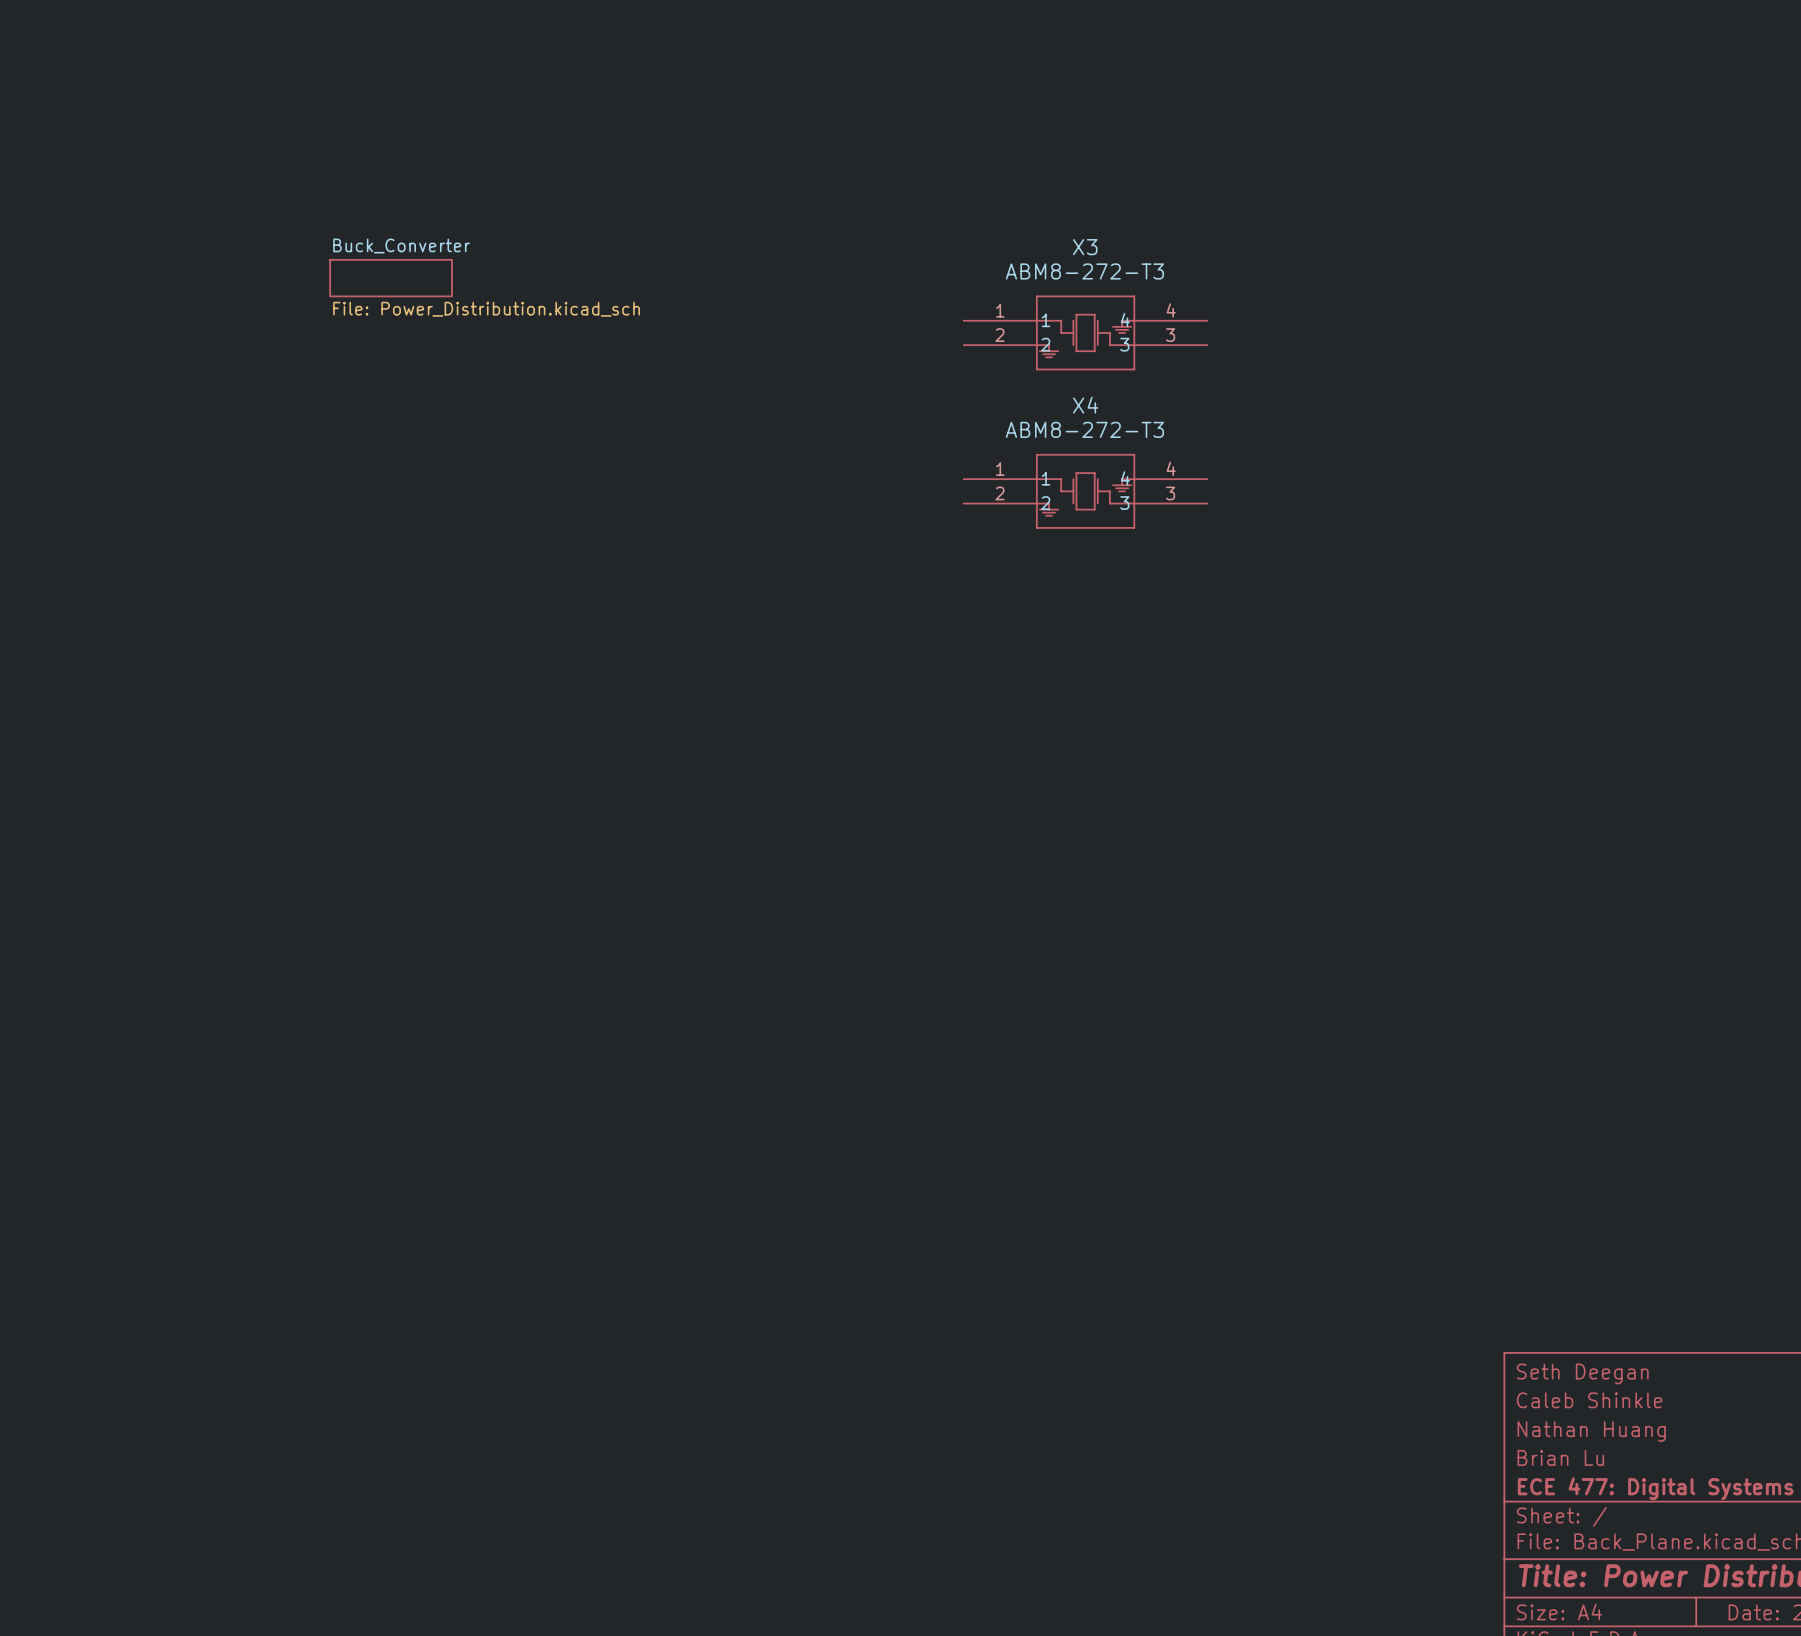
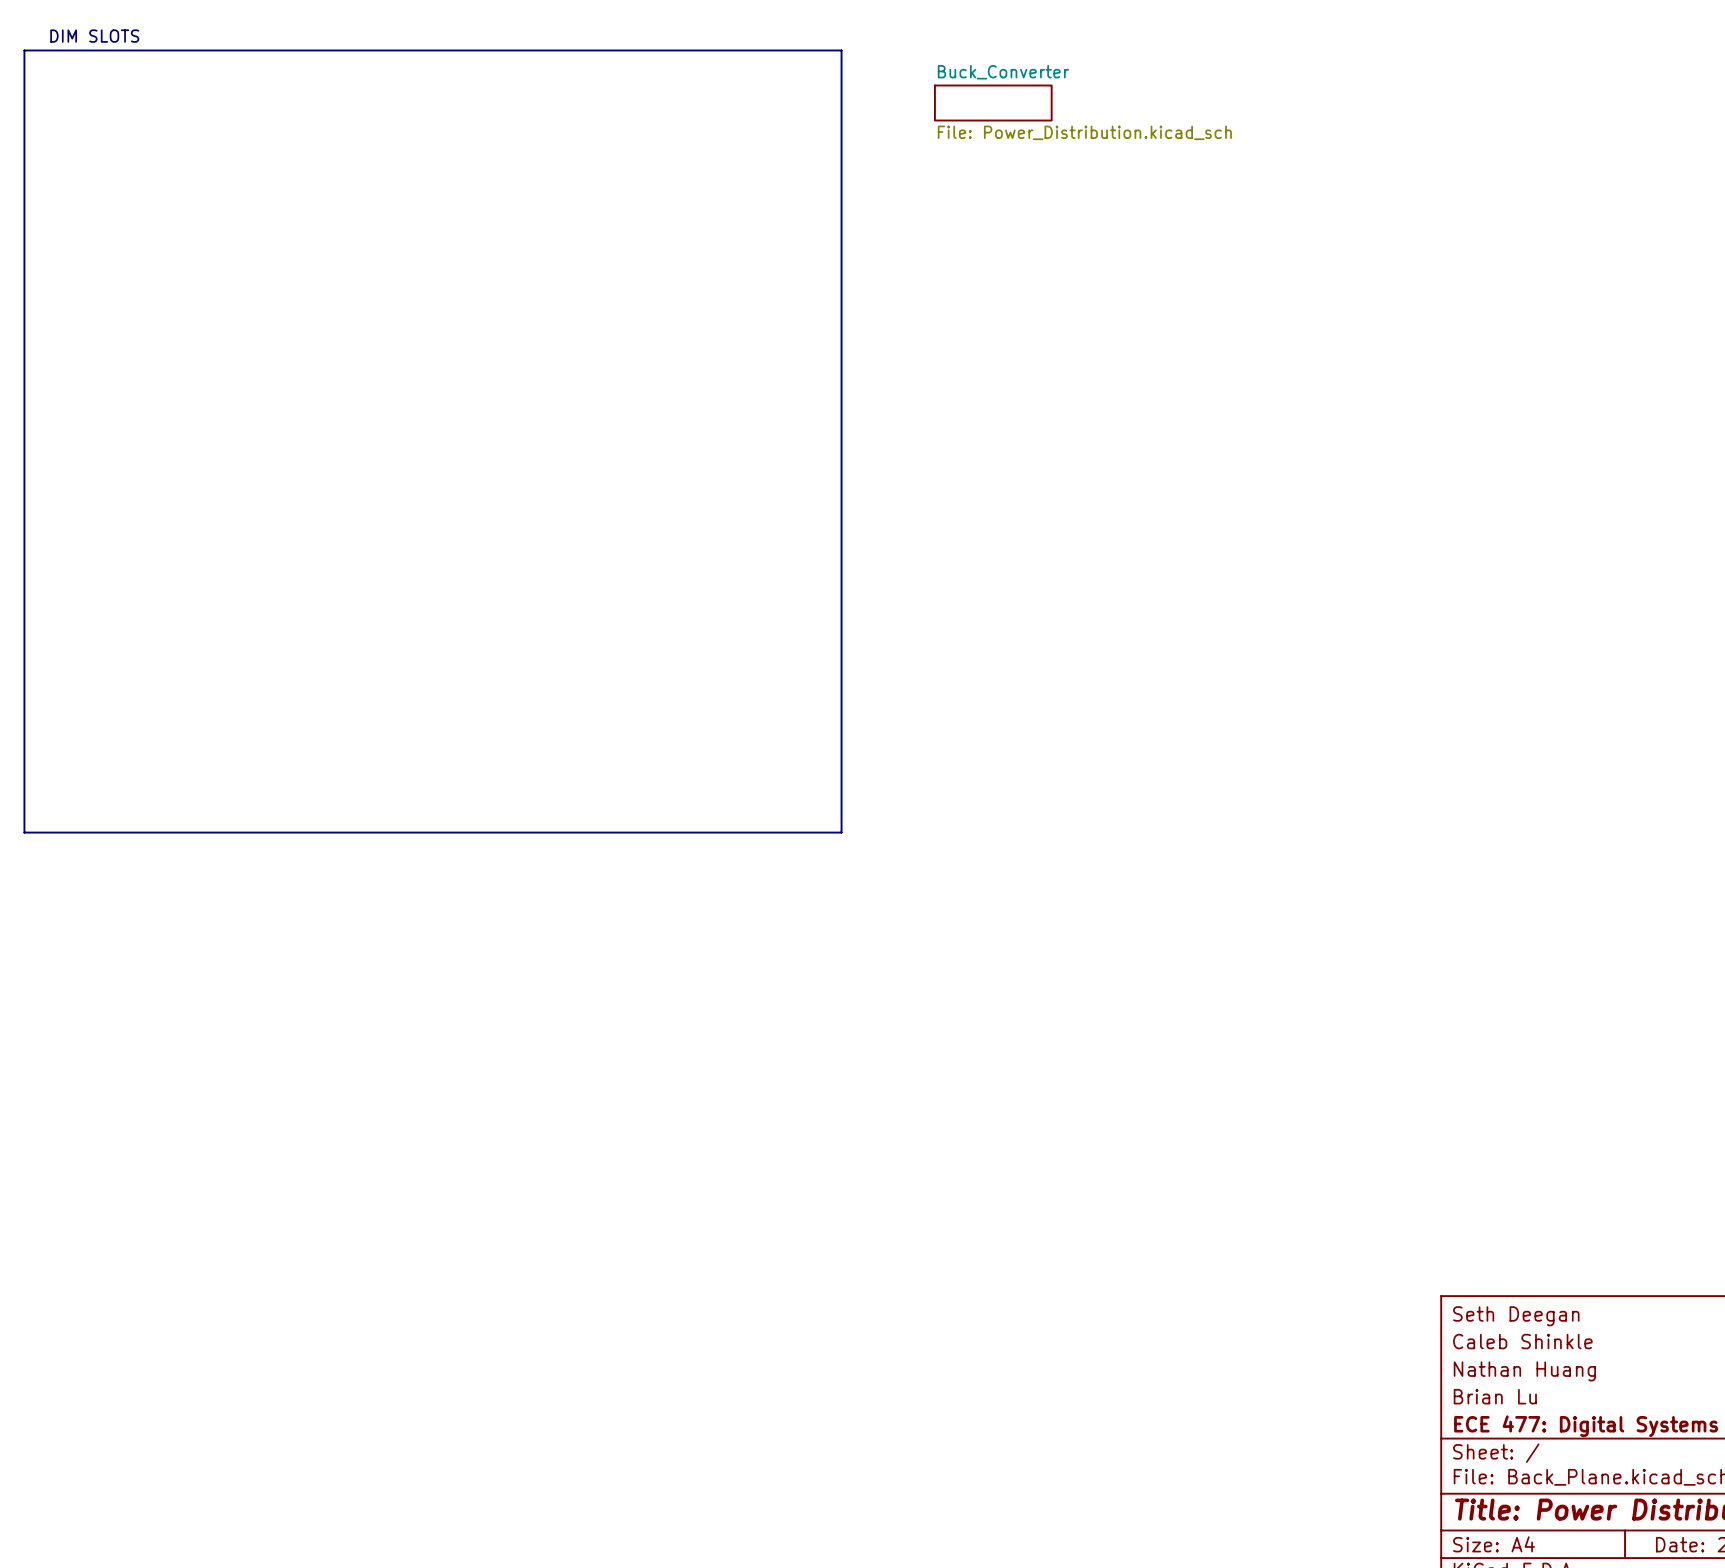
text: none -> DIM SLOTS (94, 36)
line: none -> (24, 50) (841, 50) (841, 832) (24, 832) (24, 50)
sheet Buck_Converter: none -> File: Power_Distribution.kicad_sch (993, 103)
sheet Buck_Converter: File: Power_Distribution.kicad_sch (391, 278) -> none
X3: ABM8-272-T3 (1085, 332) -> none
X4: ABM8-272-T3 (1085, 491) -> none

